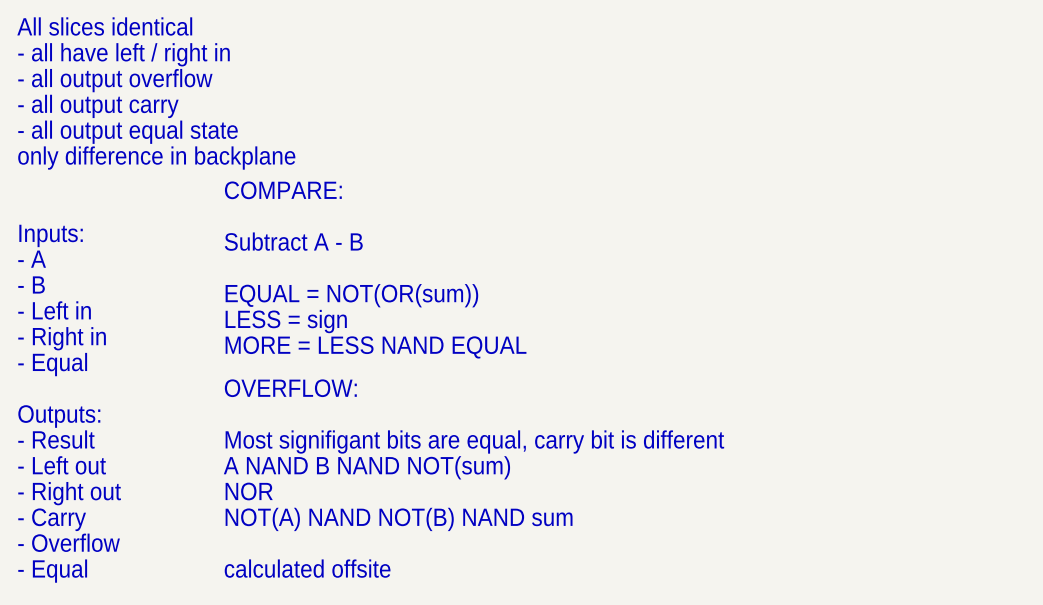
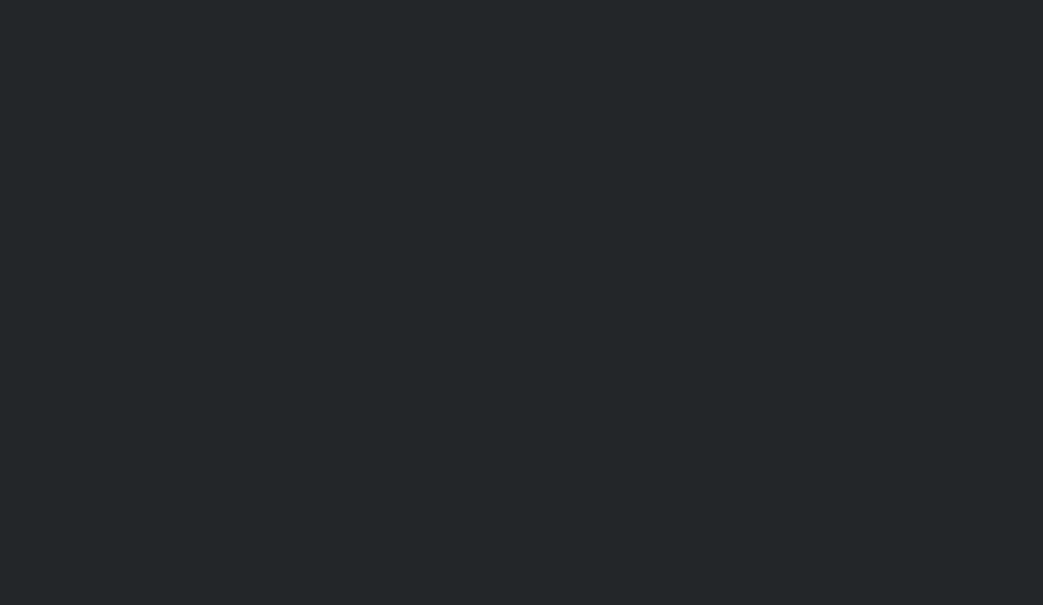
text: All slices identical (104, 26) -> none
text: - all have left / right in (124, 54) -> none
text: - all output overflow (115, 80) -> none
text: - all output carry (98, 106) -> none
text: - all output equal state (128, 132) -> none
text: only difference in backplane (156, 158) -> none
text: COMPARE: (283, 190) -> none
text: Inputs: (51, 235) -> none
text: Subtract A - B (293, 241) -> none
text: - A (32, 259) -> none
text: - B (31, 284) -> none
text: EQUAL = NOT(OR(sum)) (351, 295) -> none
text: - Left in (54, 310) -> none
text: LESS = sign (286, 321) -> none
text: - Right in (62, 338) -> none
text: MORE = LESS NAND EQUAL (376, 347) -> none
text: - Equal (52, 364) -> none
text: OVERFLOW: (290, 388) -> none
text: Outputs: (59, 416) -> none
text: - Result (56, 439) -> none
text: Most signifigant bits are equal, carry bit is different (474, 442) -> none
text: - Left out (62, 465) -> none
text: A NAND B NAND NOT(sum) (366, 467) -> none
text: NOR (249, 491) -> none
text: - Right out (69, 493) -> none
text: - Carry (52, 519) -> none
text: NOT(A) NAND NOT(B) NAND sum (399, 519) -> none
text: - Overflow (69, 542) -> none
text: calculated offsite (307, 568) -> none
text: - Equal (52, 571) -> none

